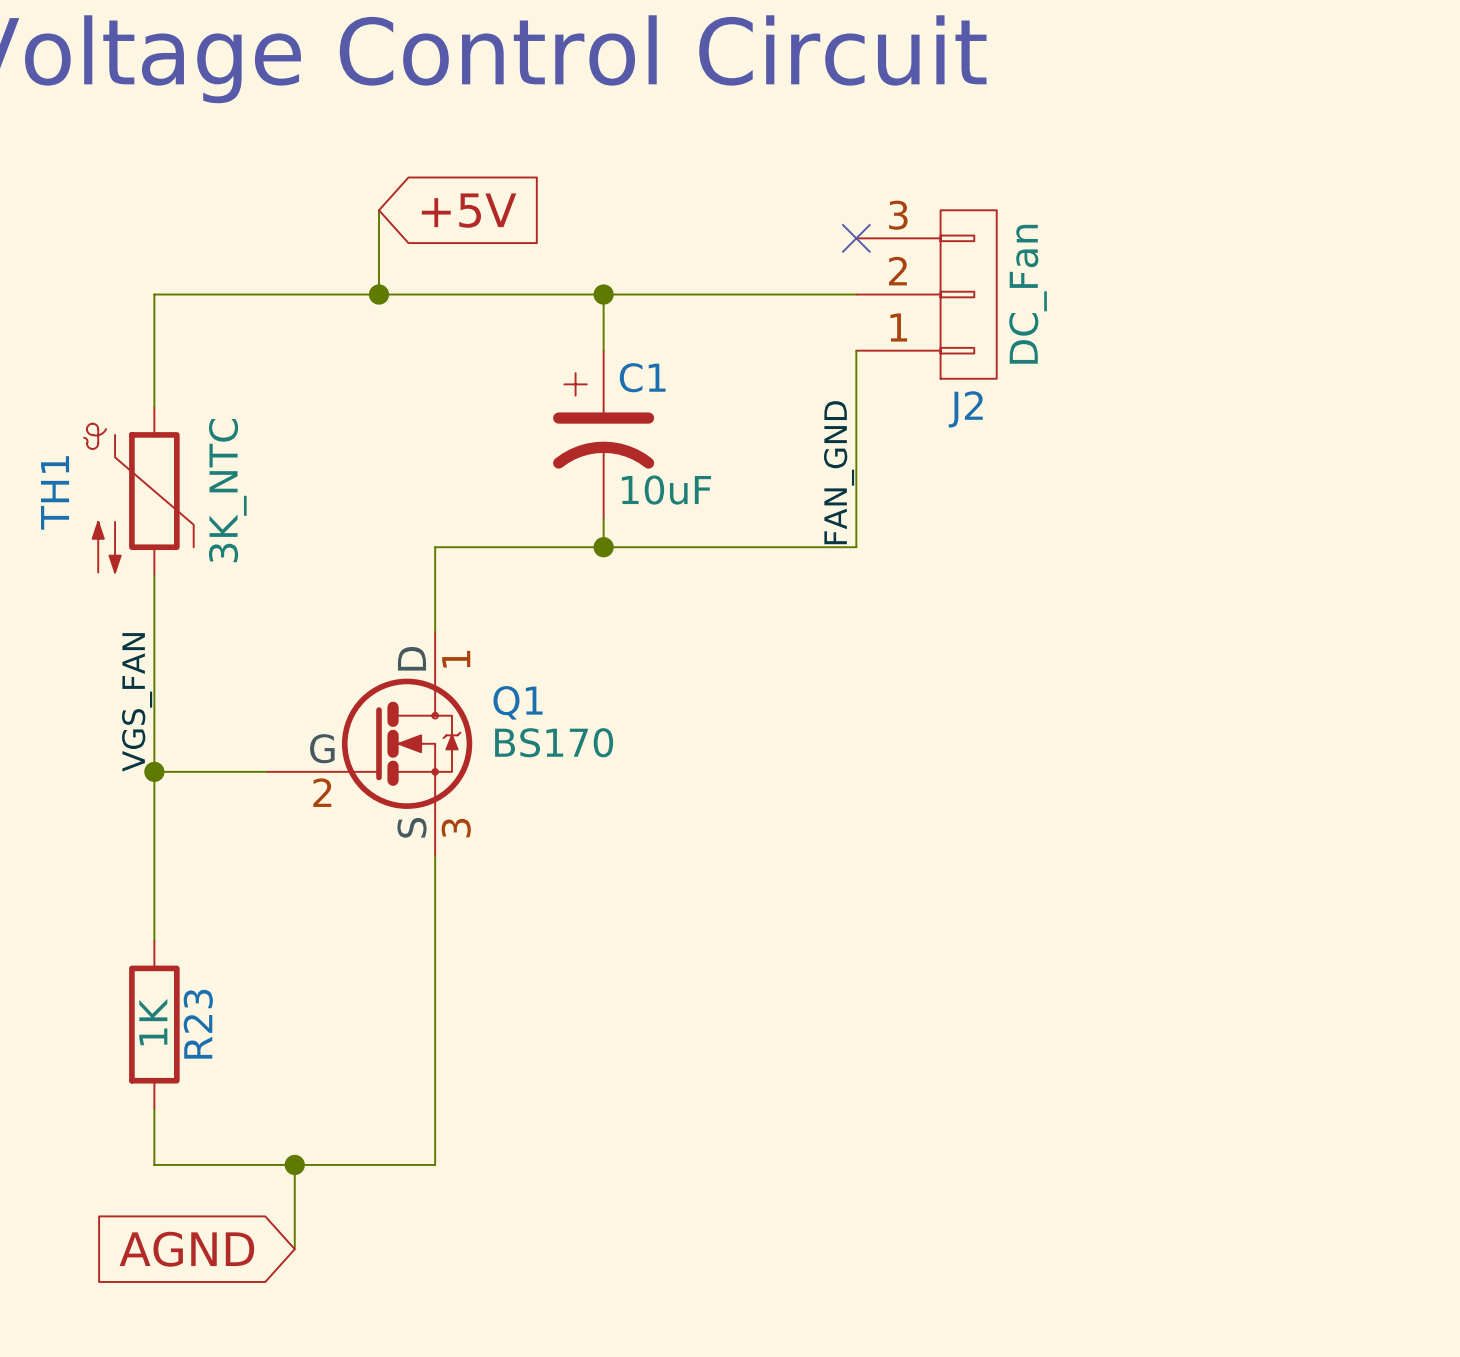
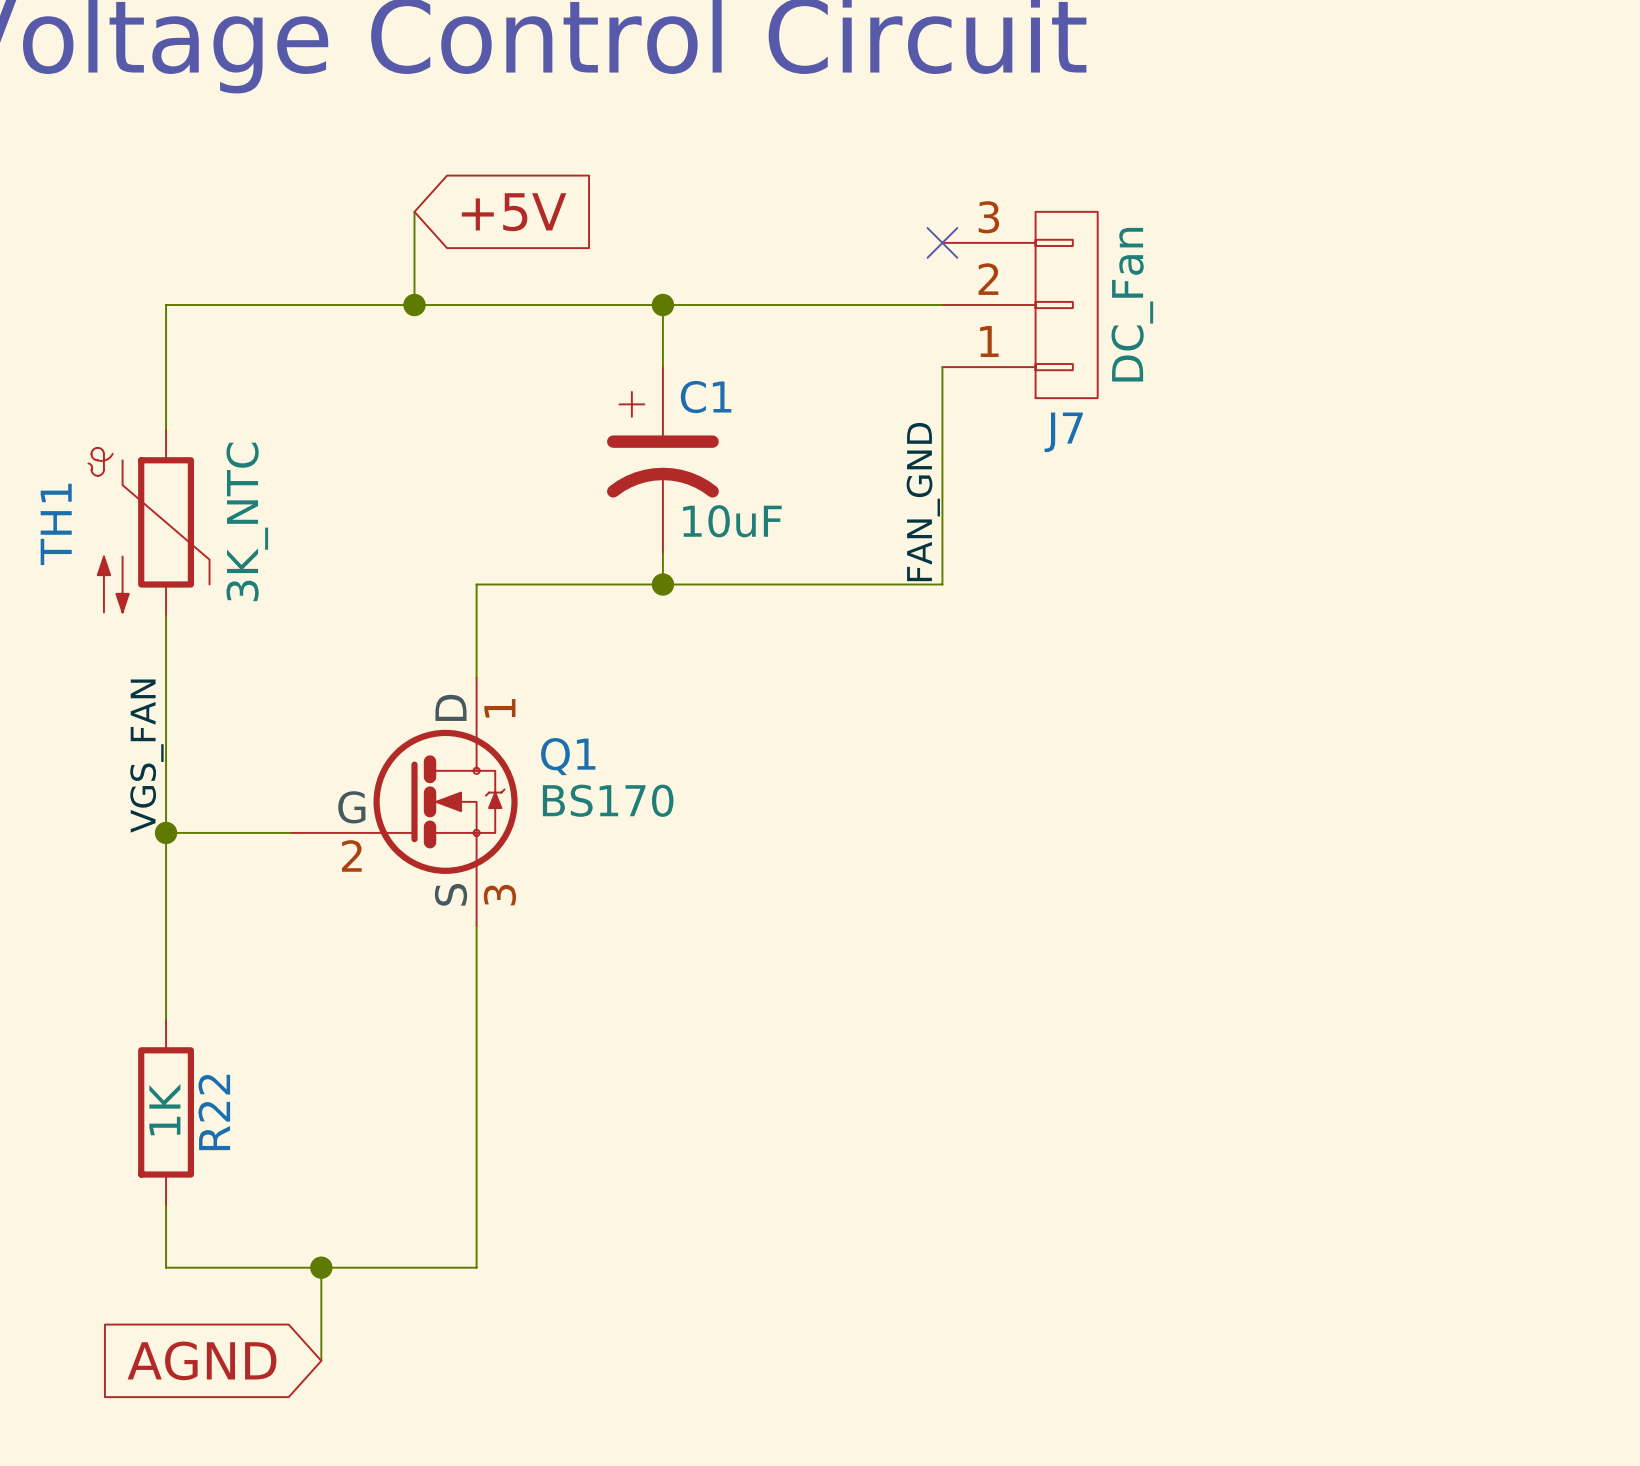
J2 name: J2 (965, 409) -> J7 (1063, 432)
R23 name: R23 (198, 1024) -> R22 (214, 1112)

